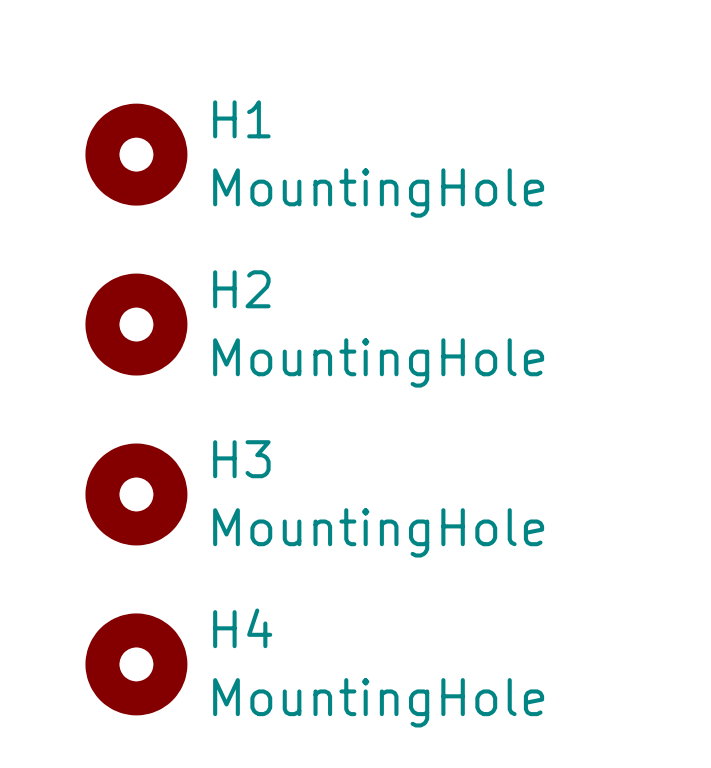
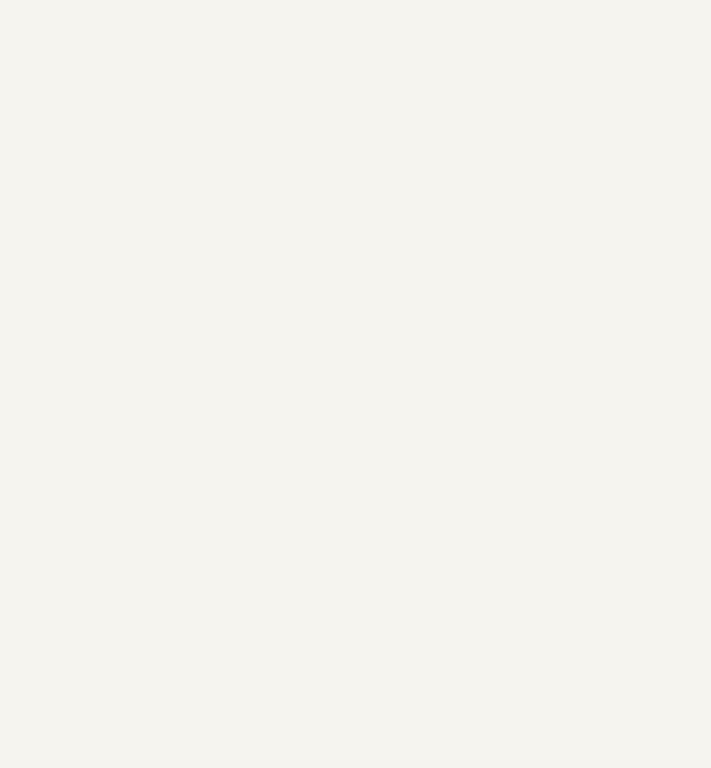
H1: MountingHole (136, 154) -> none
H2: MountingHole (136, 324) -> none
H3: MountingHole (136, 494) -> none
H4: MountingHole (136, 664) -> none

